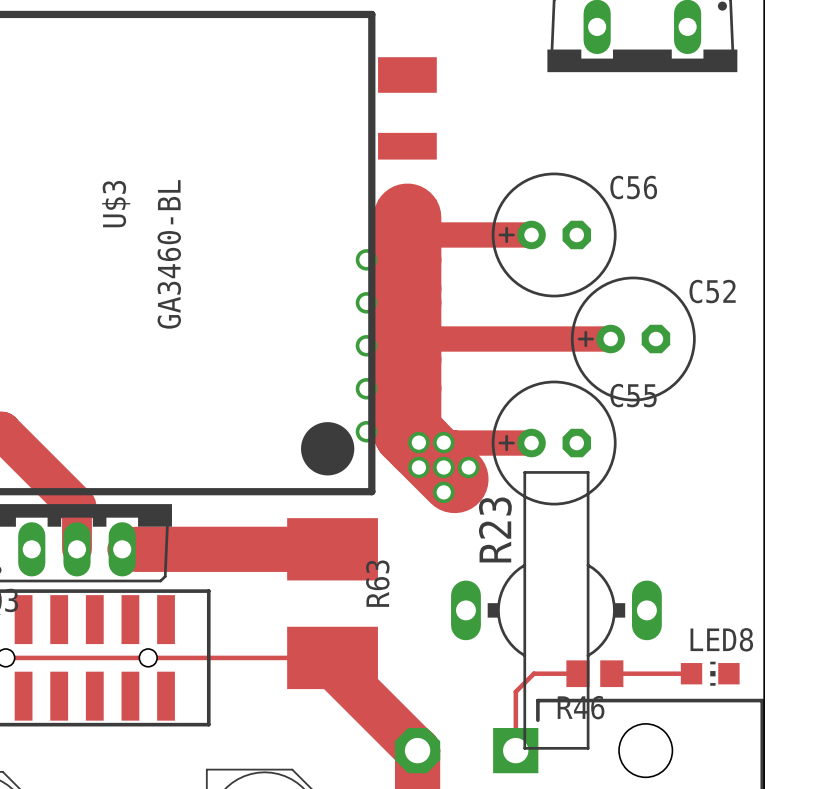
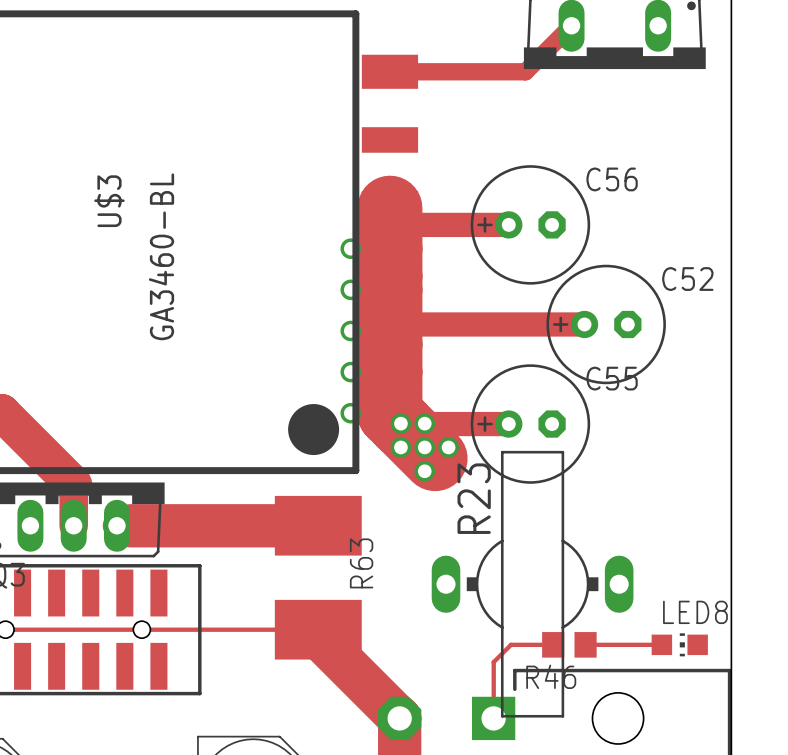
track: none -> (571, 25) (525, 71) (389, 71)

